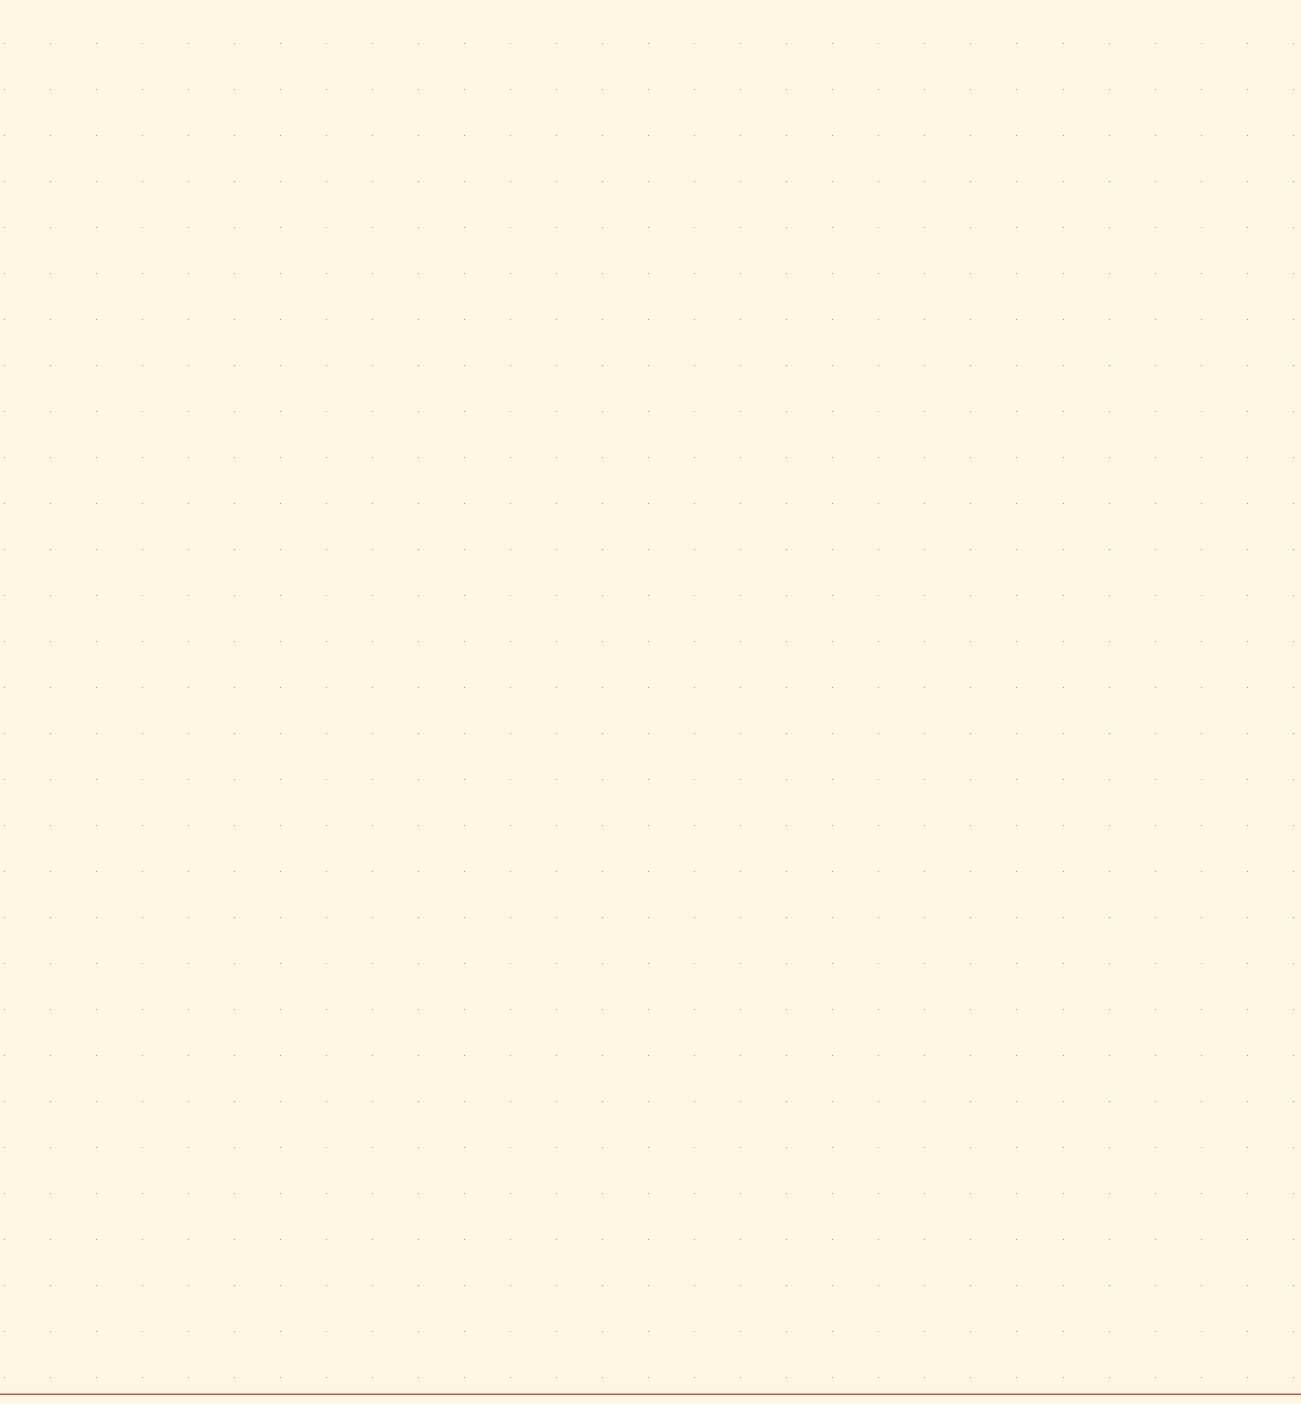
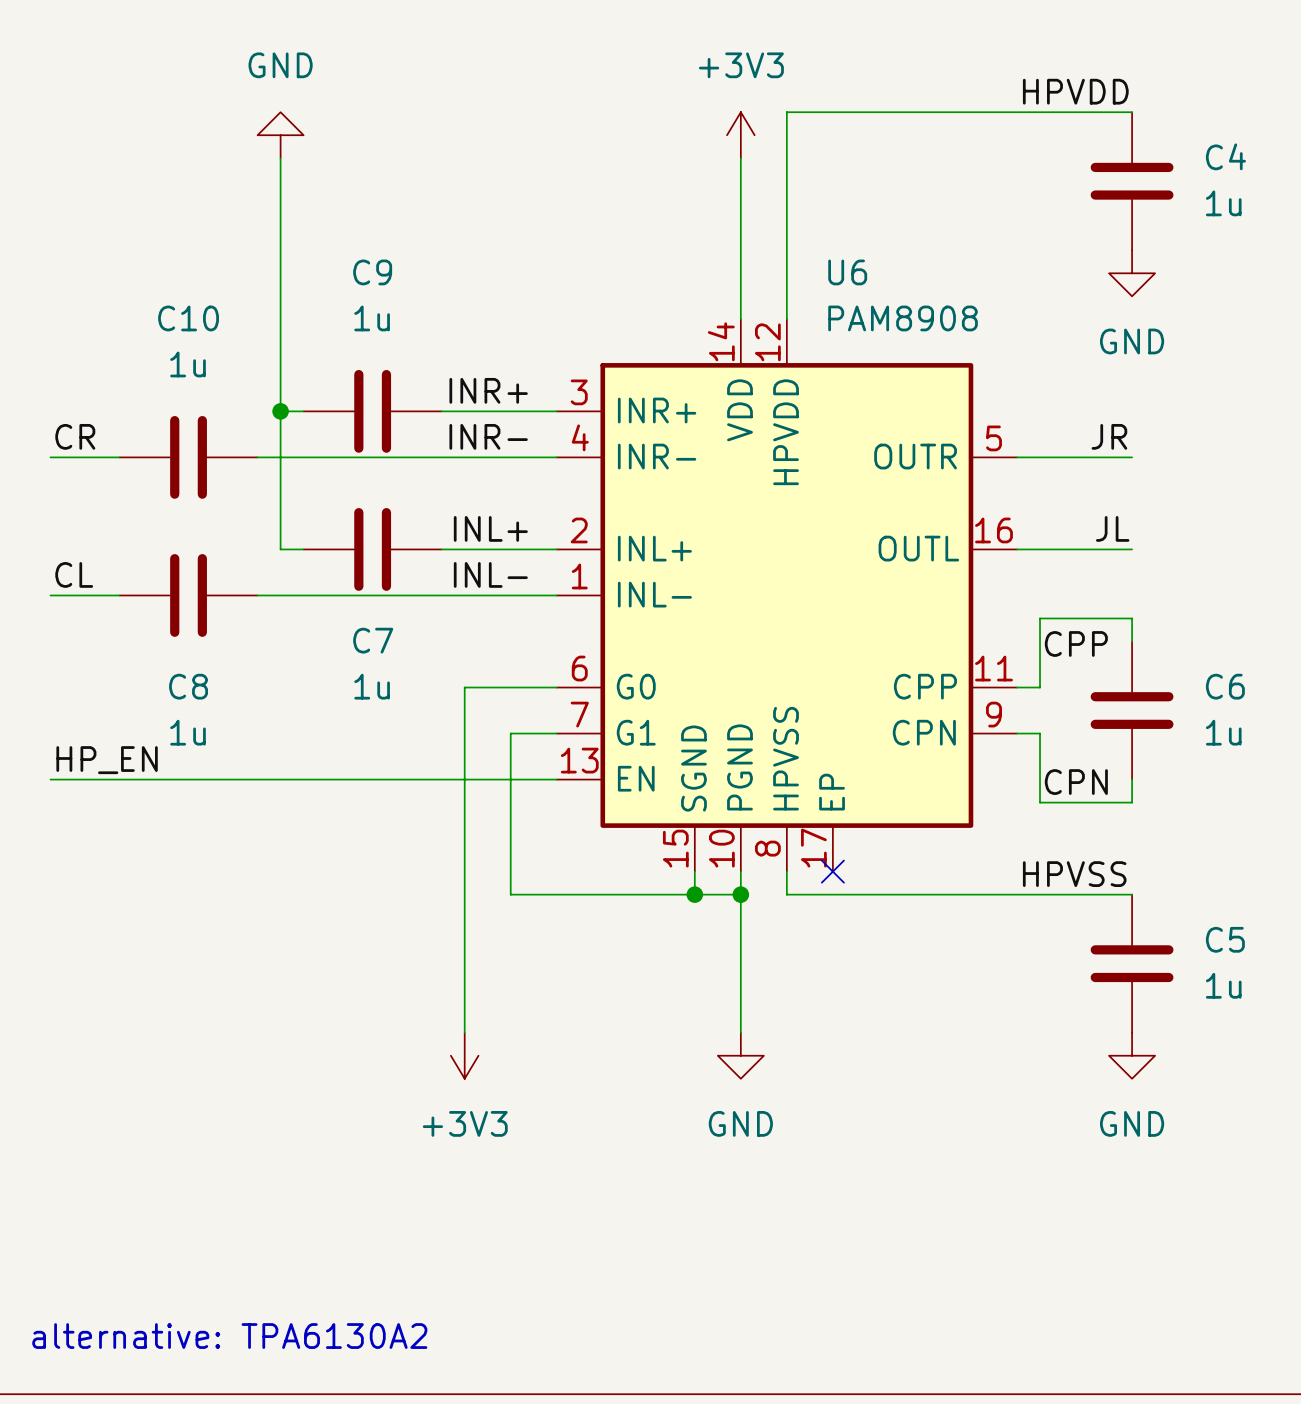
label: none -> HPVDD (1075, 91)
wire: none -> (1132, 112) (786, 112) (786, 319)
power symbol: none -> GND (280, 135)
power symbol: none -> +3V3 (740, 135)
wire: none -> (280, 158) (280, 549) (303, 549)
wire: none -> (740, 158) (740, 319)
C4: none -> 1u (1132, 181)
power symbol: none -> GND (1132, 273)
label: none -> INR+ (488, 390)
wire: none -> (280, 411) (303, 411)
junction: none -> (280, 411)
C9: none -> 1u (372, 411)
wire: none -> (441, 411) (556, 411)
label: none -> CR (75, 436)
label: none -> INR- (488, 436)
label: none -> JR (1109, 436)
wire: none -> (50, 457) (119, 457)
C10: none -> 1u (188, 457)
wire: none -> (257, 457) (556, 457)
wire: none -> (1016, 457) (1132, 457)
label: none -> INL+ (490, 528)
label: none -> JL (1112, 528)
C7: none -> 1u (372, 549)
wire: none -> (441, 549) (556, 549)
wire: none -> (1016, 549) (1132, 549)
label: none -> CL (74, 574)
label: none -> INL- (490, 574)
wire: none -> (50, 595) (119, 595)
C8: none -> 1u (188, 595)
wire: none -> (257, 595) (556, 595)
U6: none -> PAM8908 (786, 595)
wire: none -> (1132, 641) (1132, 618) (1040, 618) (1040, 687) (1016, 687)
label: none -> CPP (1076, 643)
wire: none -> (556, 687) (464, 687) (464, 1032)
C6: none -> 1u (1132, 710)
wire: none -> (556, 733) (510, 733) (510, 894) (740, 894)
wire: none -> (1016, 733) (1040, 733) (1040, 802) (1132, 802) (1132, 779)
label: none -> HP_EN (107, 760)
wire: none -> (50, 779) (556, 779)
label: none -> CPN (1076, 782)
wire: none -> (694, 871) (694, 894)
wire: none -> (740, 871) (740, 1032)
wire: none -> (786, 871) (786, 894) (1132, 894)
no-connect mark: none -> (832, 871)
label: none -> HPVSS (1074, 874)
junction: none -> (694, 894)
junction: none -> (740, 894)
C5: none -> 1u (1132, 963)
power symbol: none -> +3V3 (464, 1055)
power symbol: none -> GND (740, 1055)
power symbol: none -> GND (1132, 1055)
text: none -> alternative: TPA6130A2 (229, 1336)

